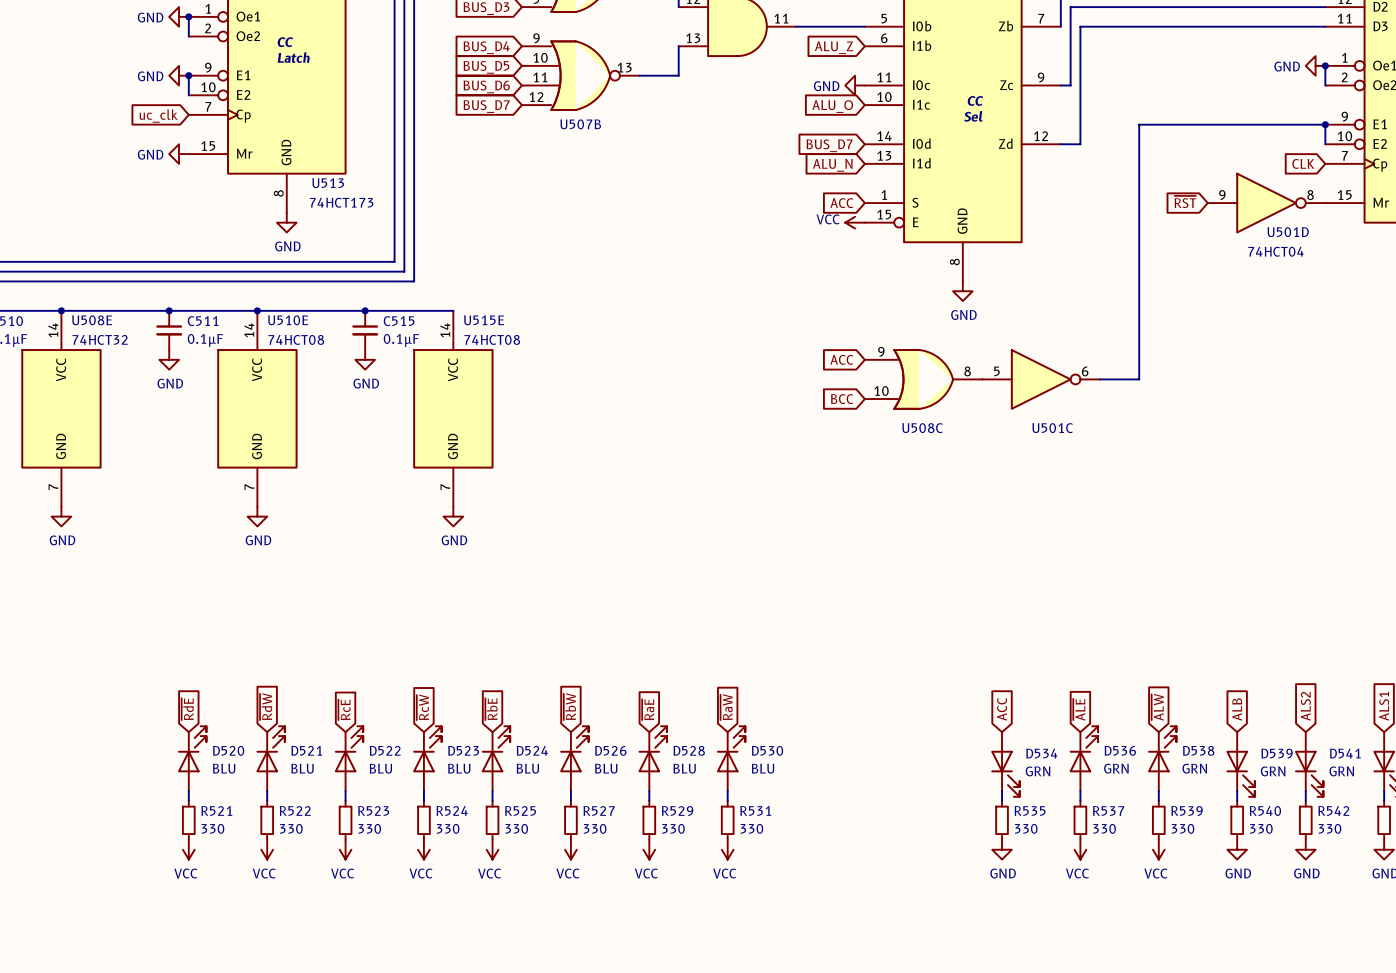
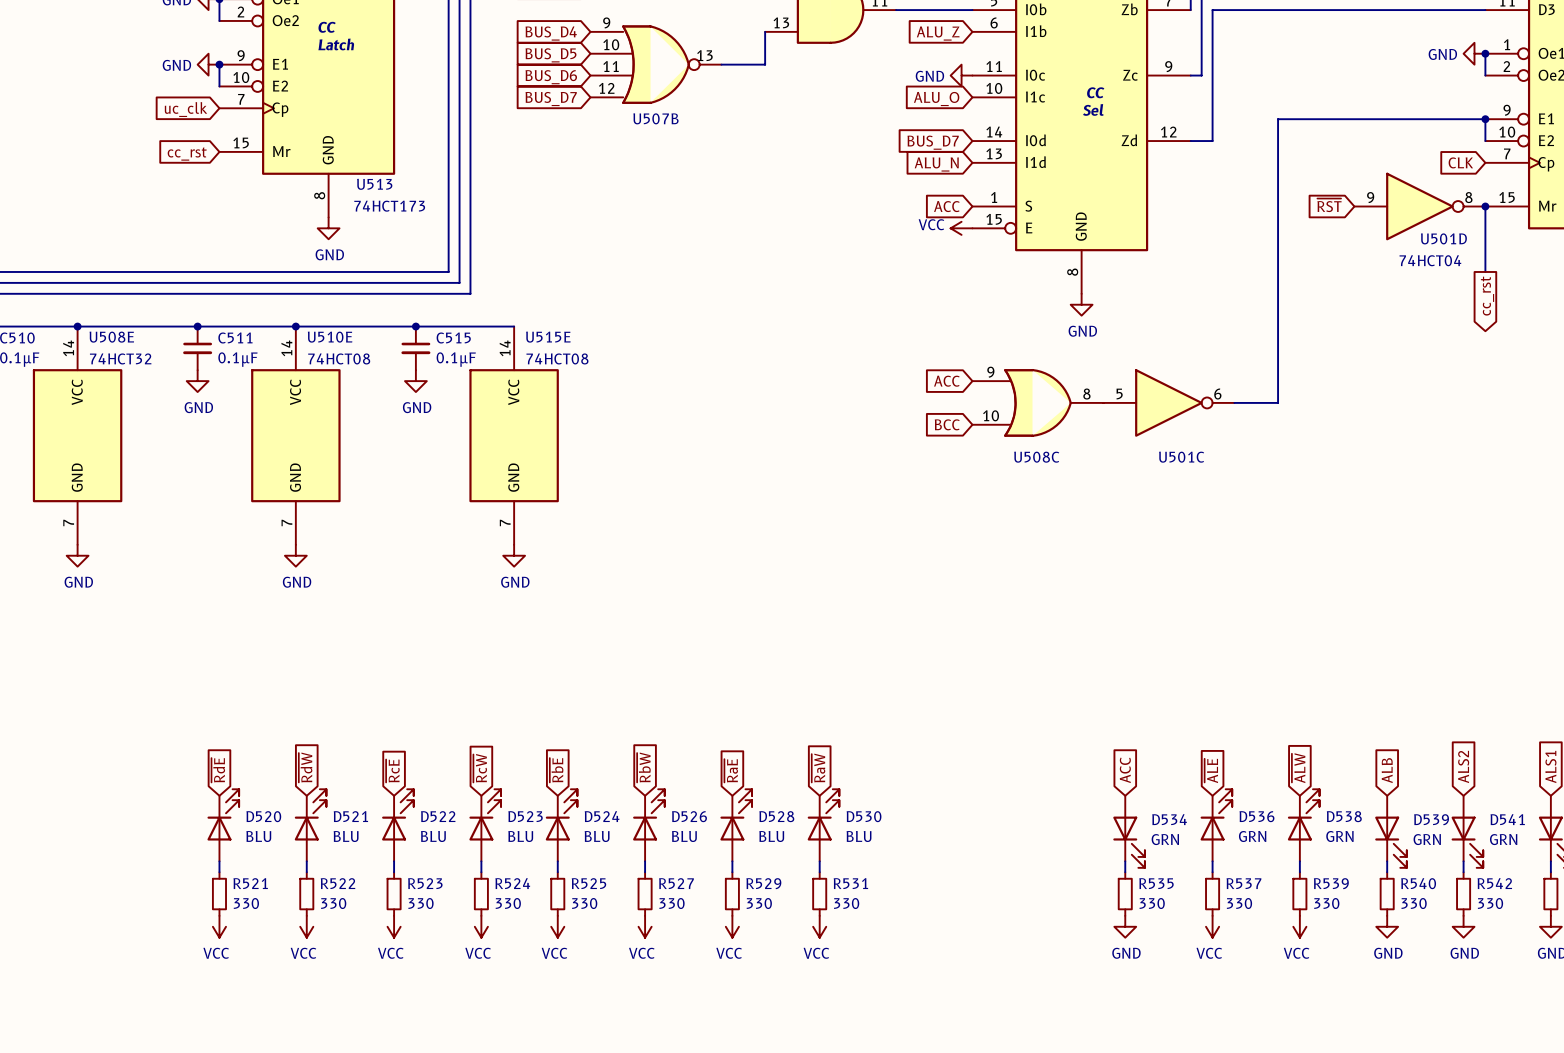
power symbol: GND (179, 154) -> none
global label: none -> cc_rst (187, 153)
wire: none -> (1485, 206) (1485, 271)
junction: none -> (1485, 206)
global label: none -> cc_rst (1487, 296)

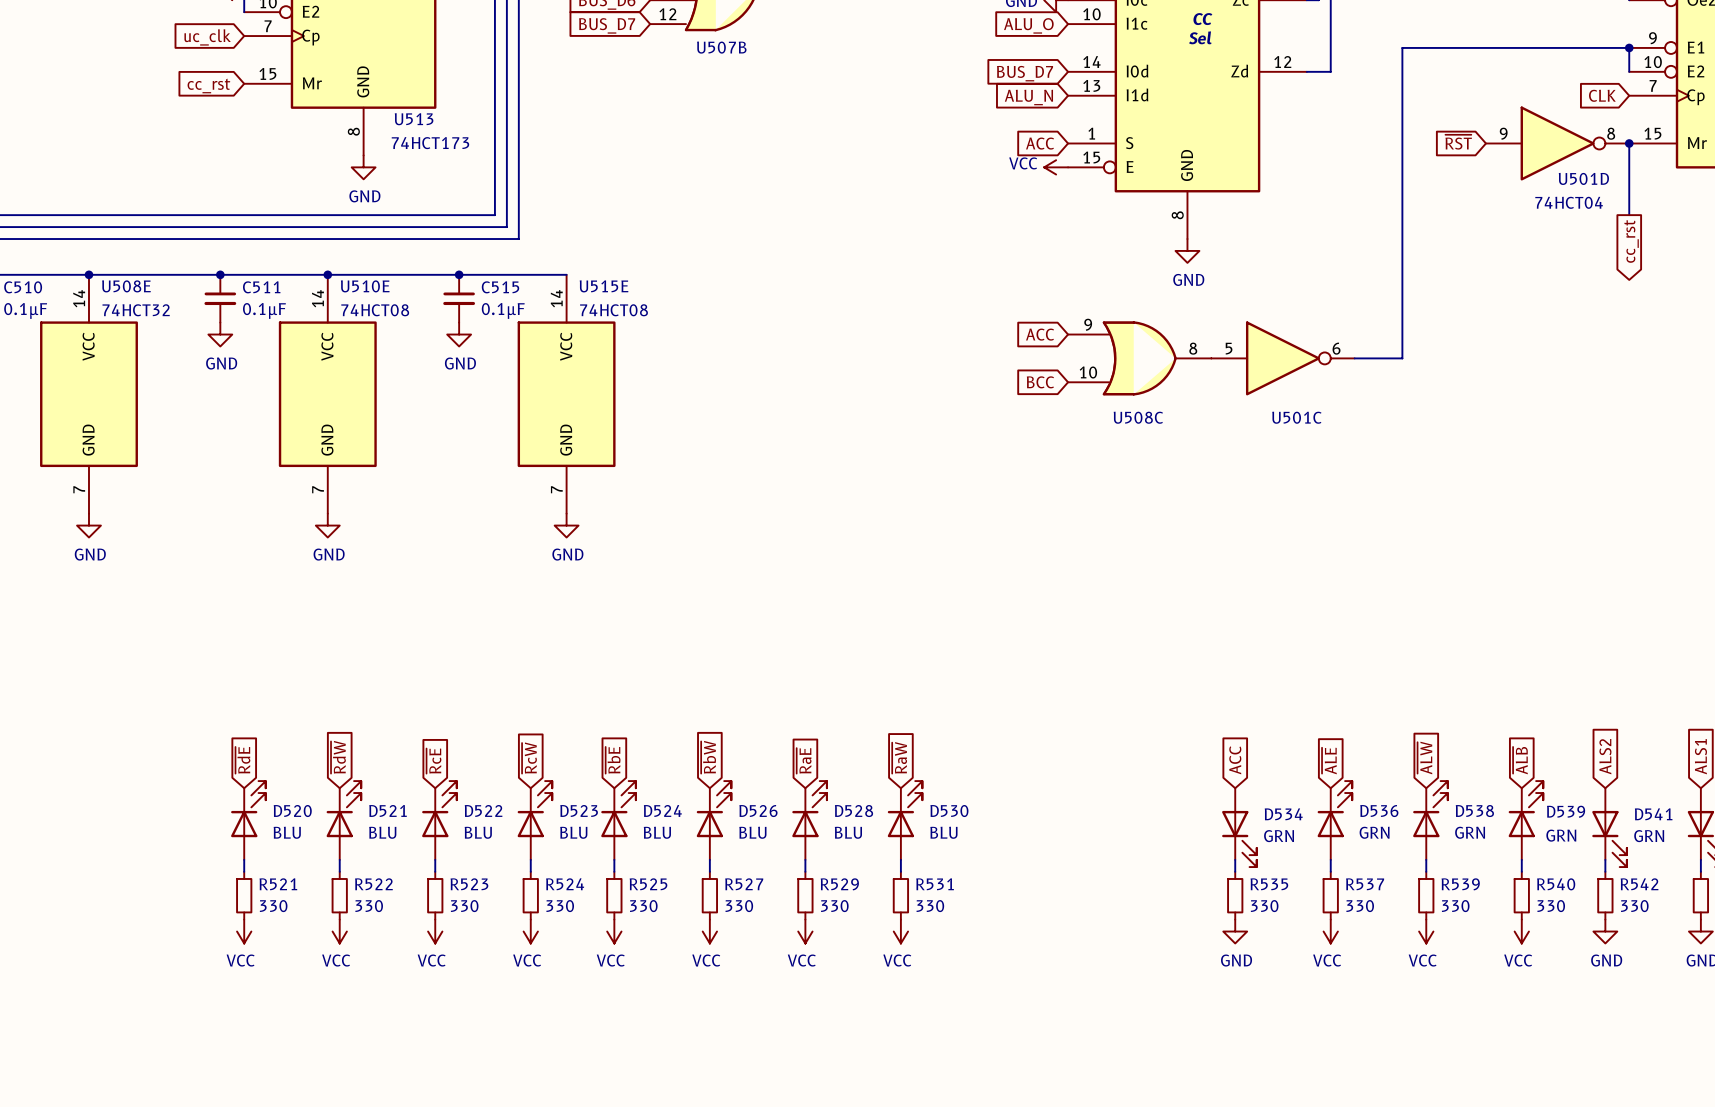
global label: ALB (1387, 770) -> ~{ALB} (1520, 760)
D539 flip: as is (1391, 842) -> up-down (1525, 809)
power symbol: GND (1387, 926) -> VCC (1521, 931)

